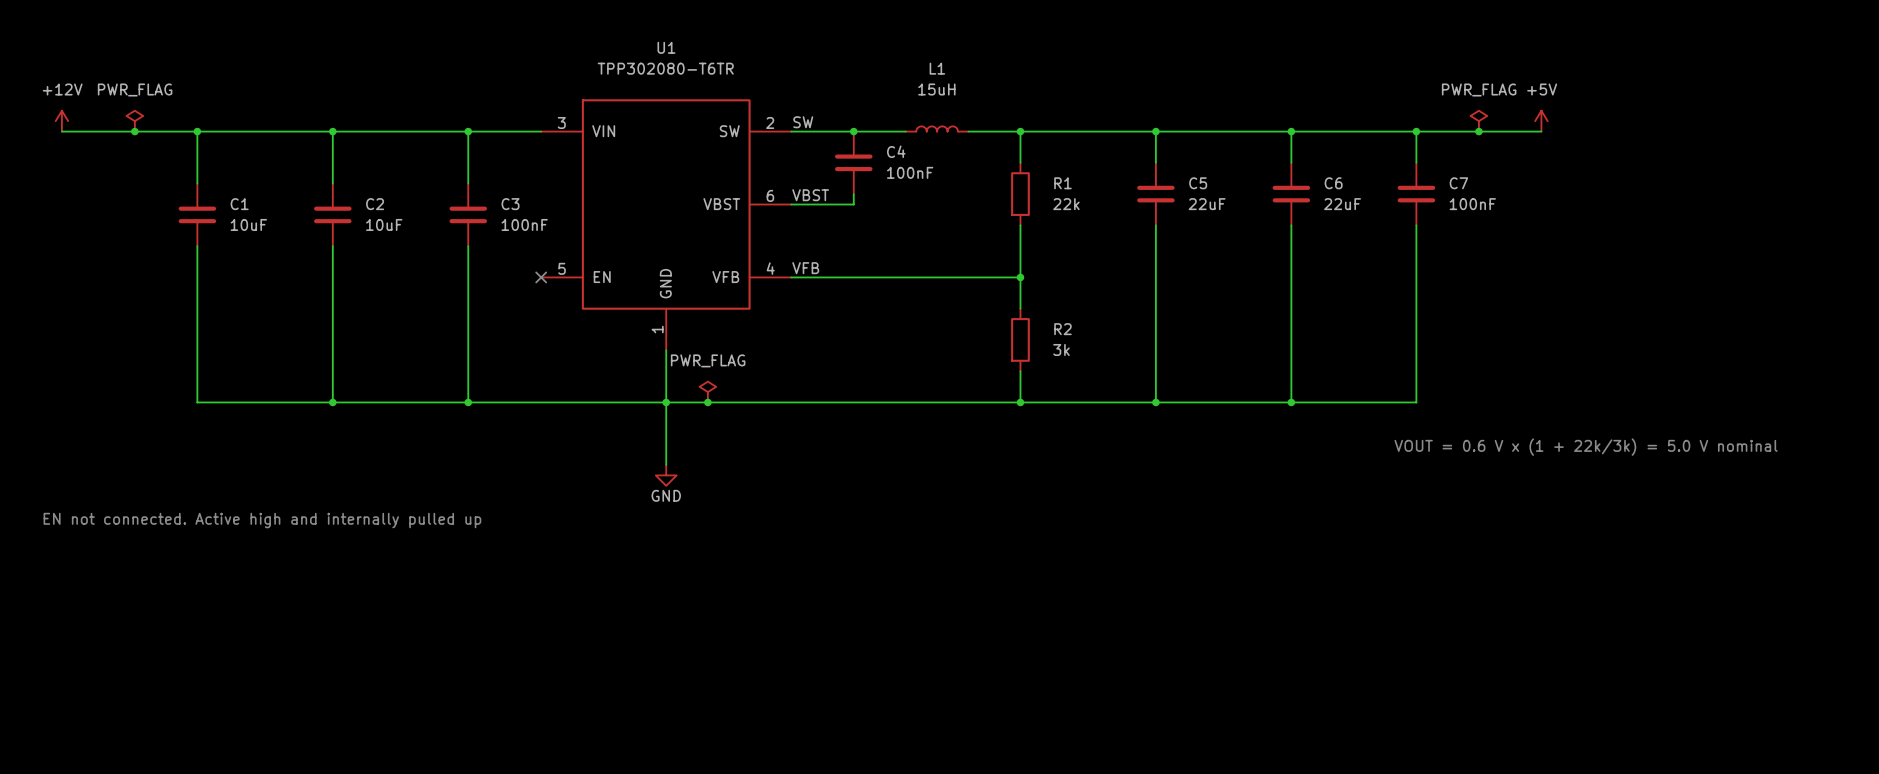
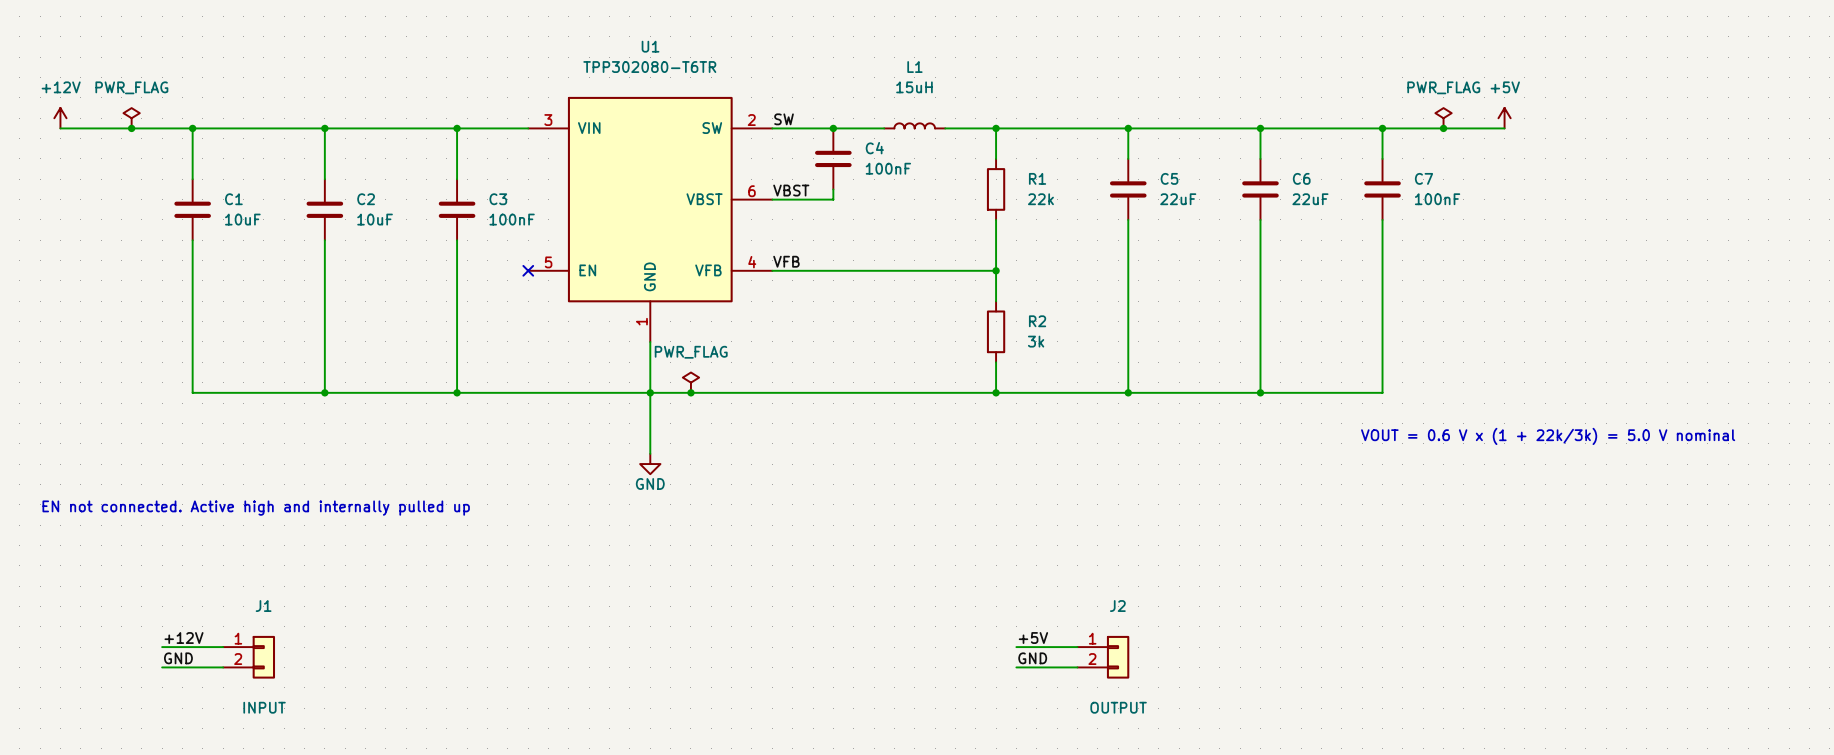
label: none -> +12V (184, 638)
label: none -> +5V (1033, 638)
wire: none -> (162, 647) (223, 647)
wire: none -> (1016, 647) (1077, 647)
J1: none -> INPUT (249, 657)
J2: none -> OUTPUT (1103, 657)
label: none -> GND (178, 658)
label: none -> GND (1032, 658)
wire: none -> (162, 667) (223, 667)
wire: none -> (1016, 667) (1077, 667)

